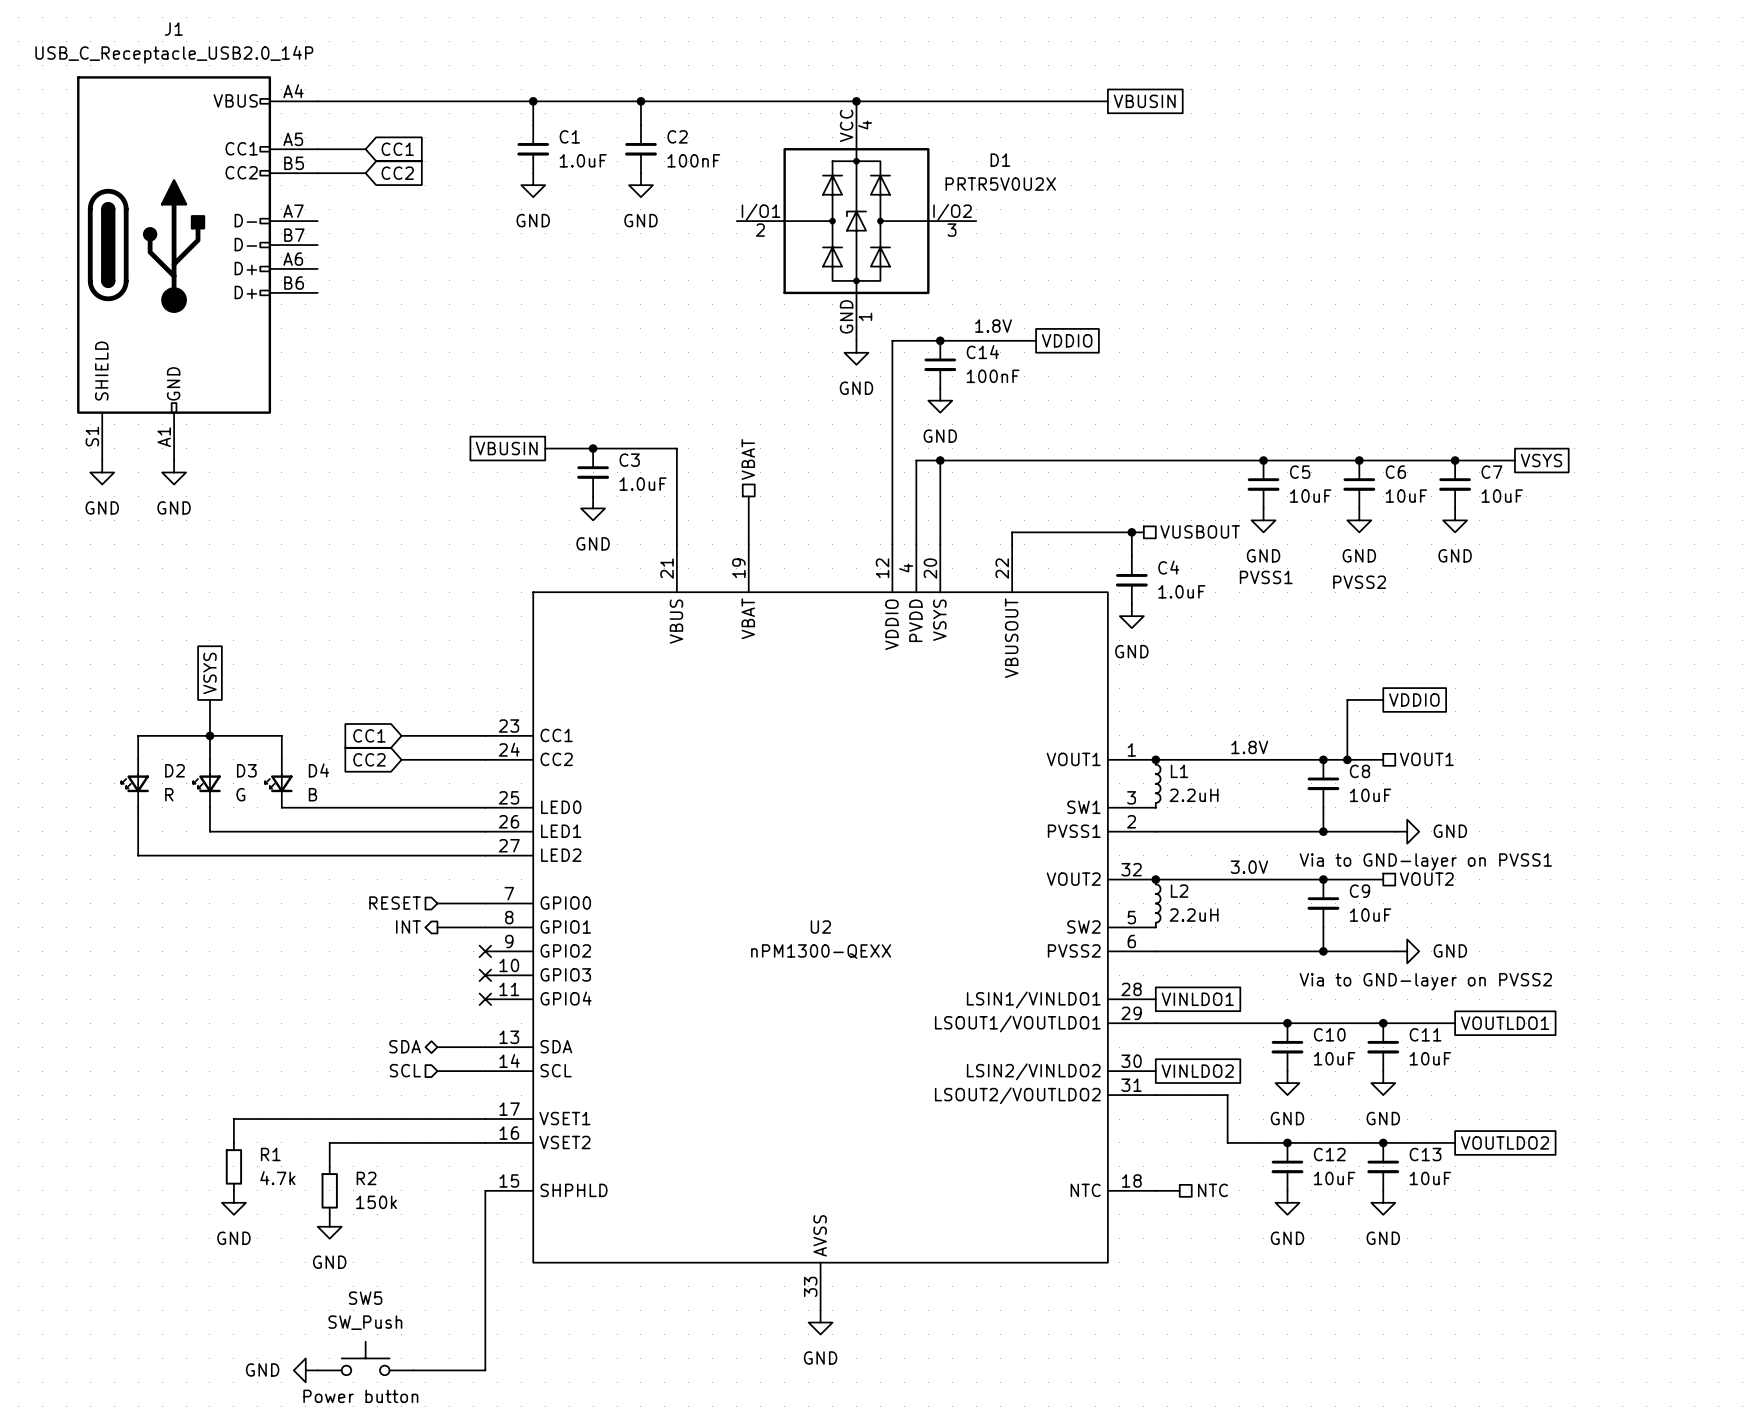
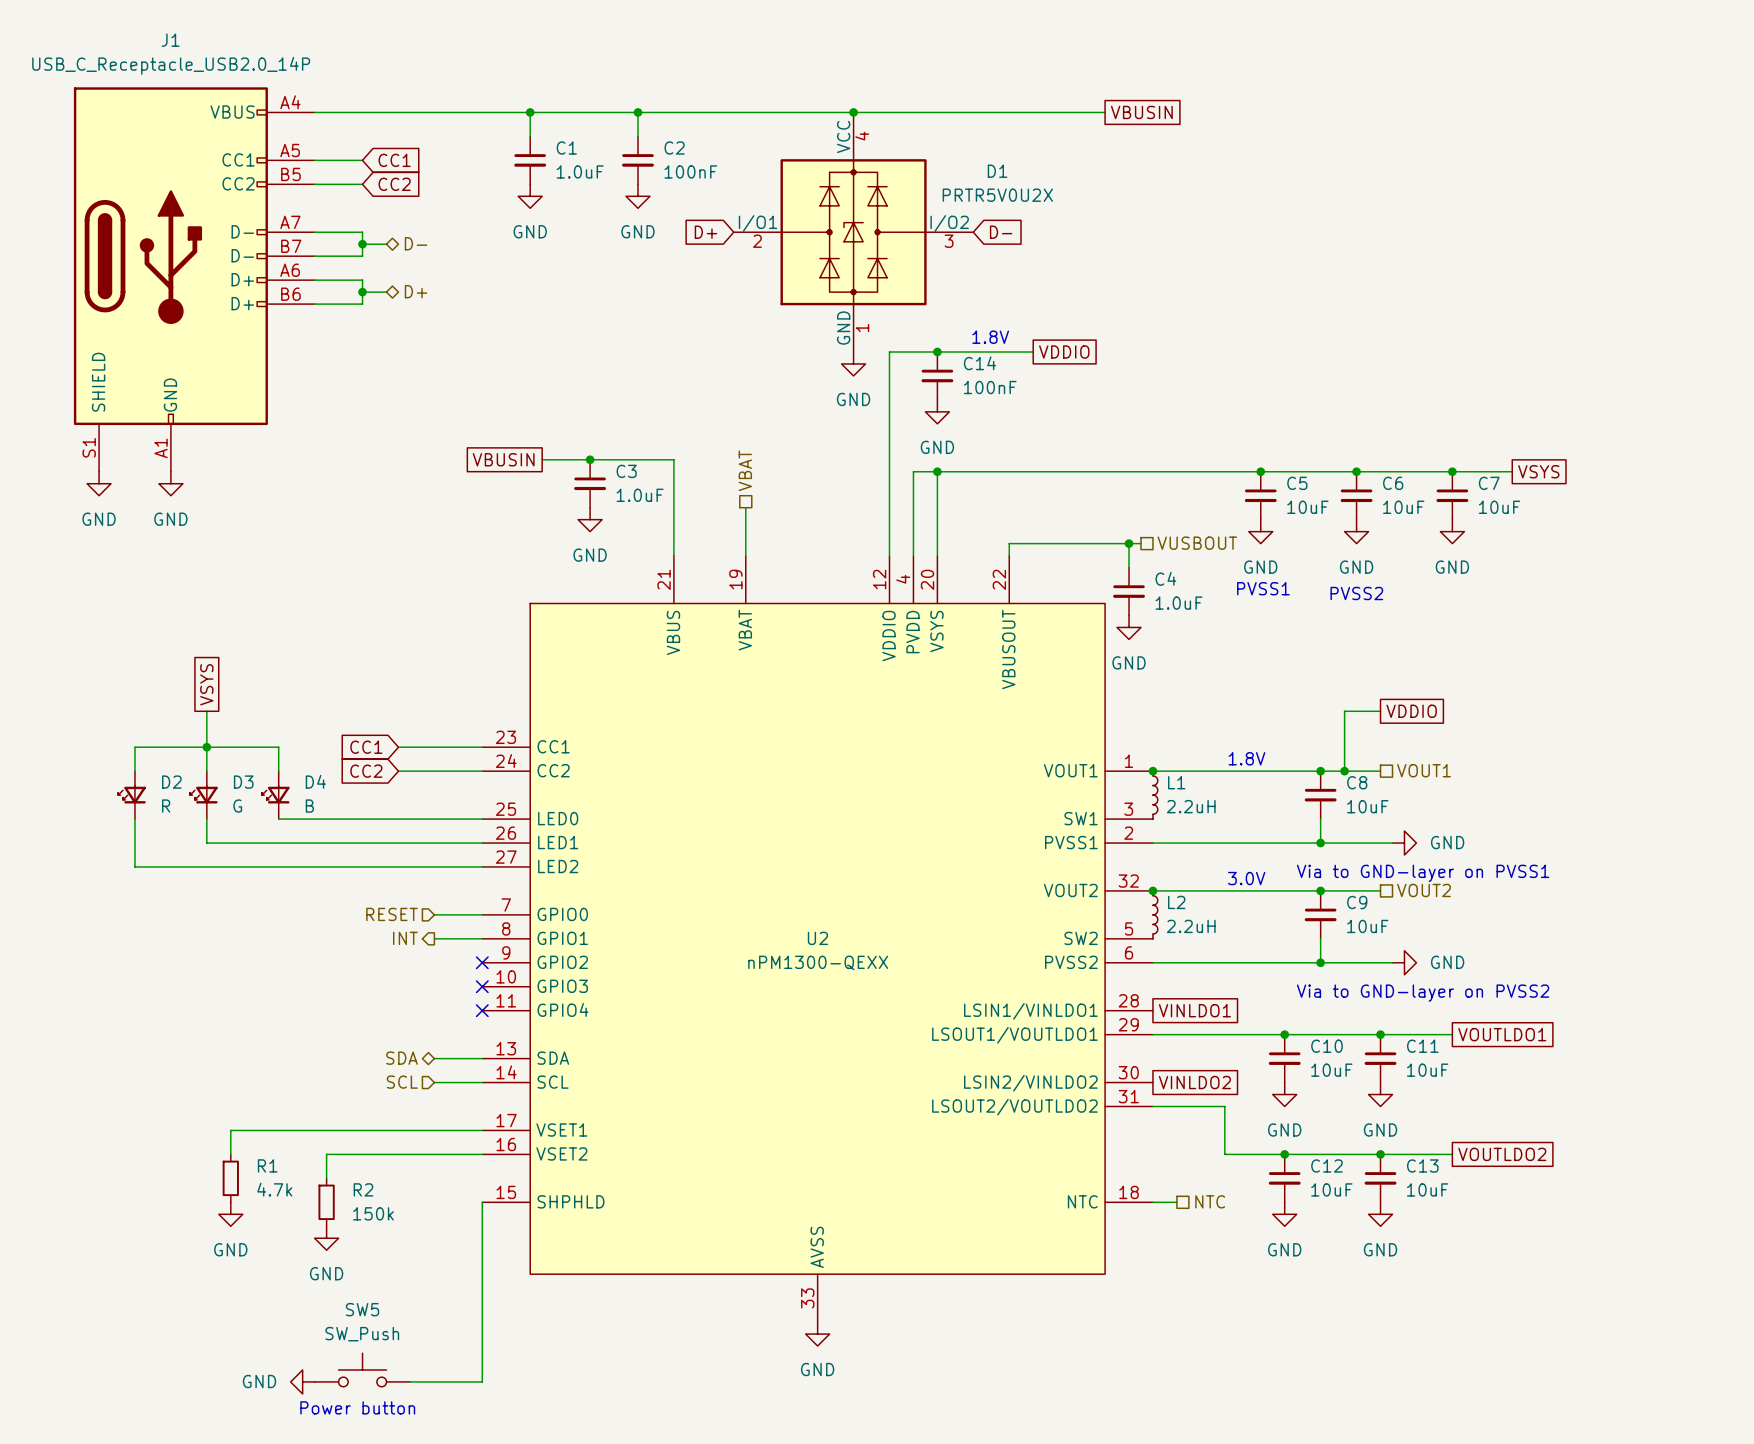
wire: none -> (314, 232) (362, 232) (362, 256) (314, 256)
global label: none -> D+ (705, 232)
global label: none -> D- (1001, 232)
hierarchical label: none -> D- (416, 243)
wire: none -> (362, 244) (386, 244)
junction: none -> (362, 244)
wire: none -> (314, 280) (362, 280) (362, 304) (314, 304)
wire: none -> (362, 292) (386, 292)
junction: none -> (362, 292)
hierarchical label: none -> D+ (416, 291)

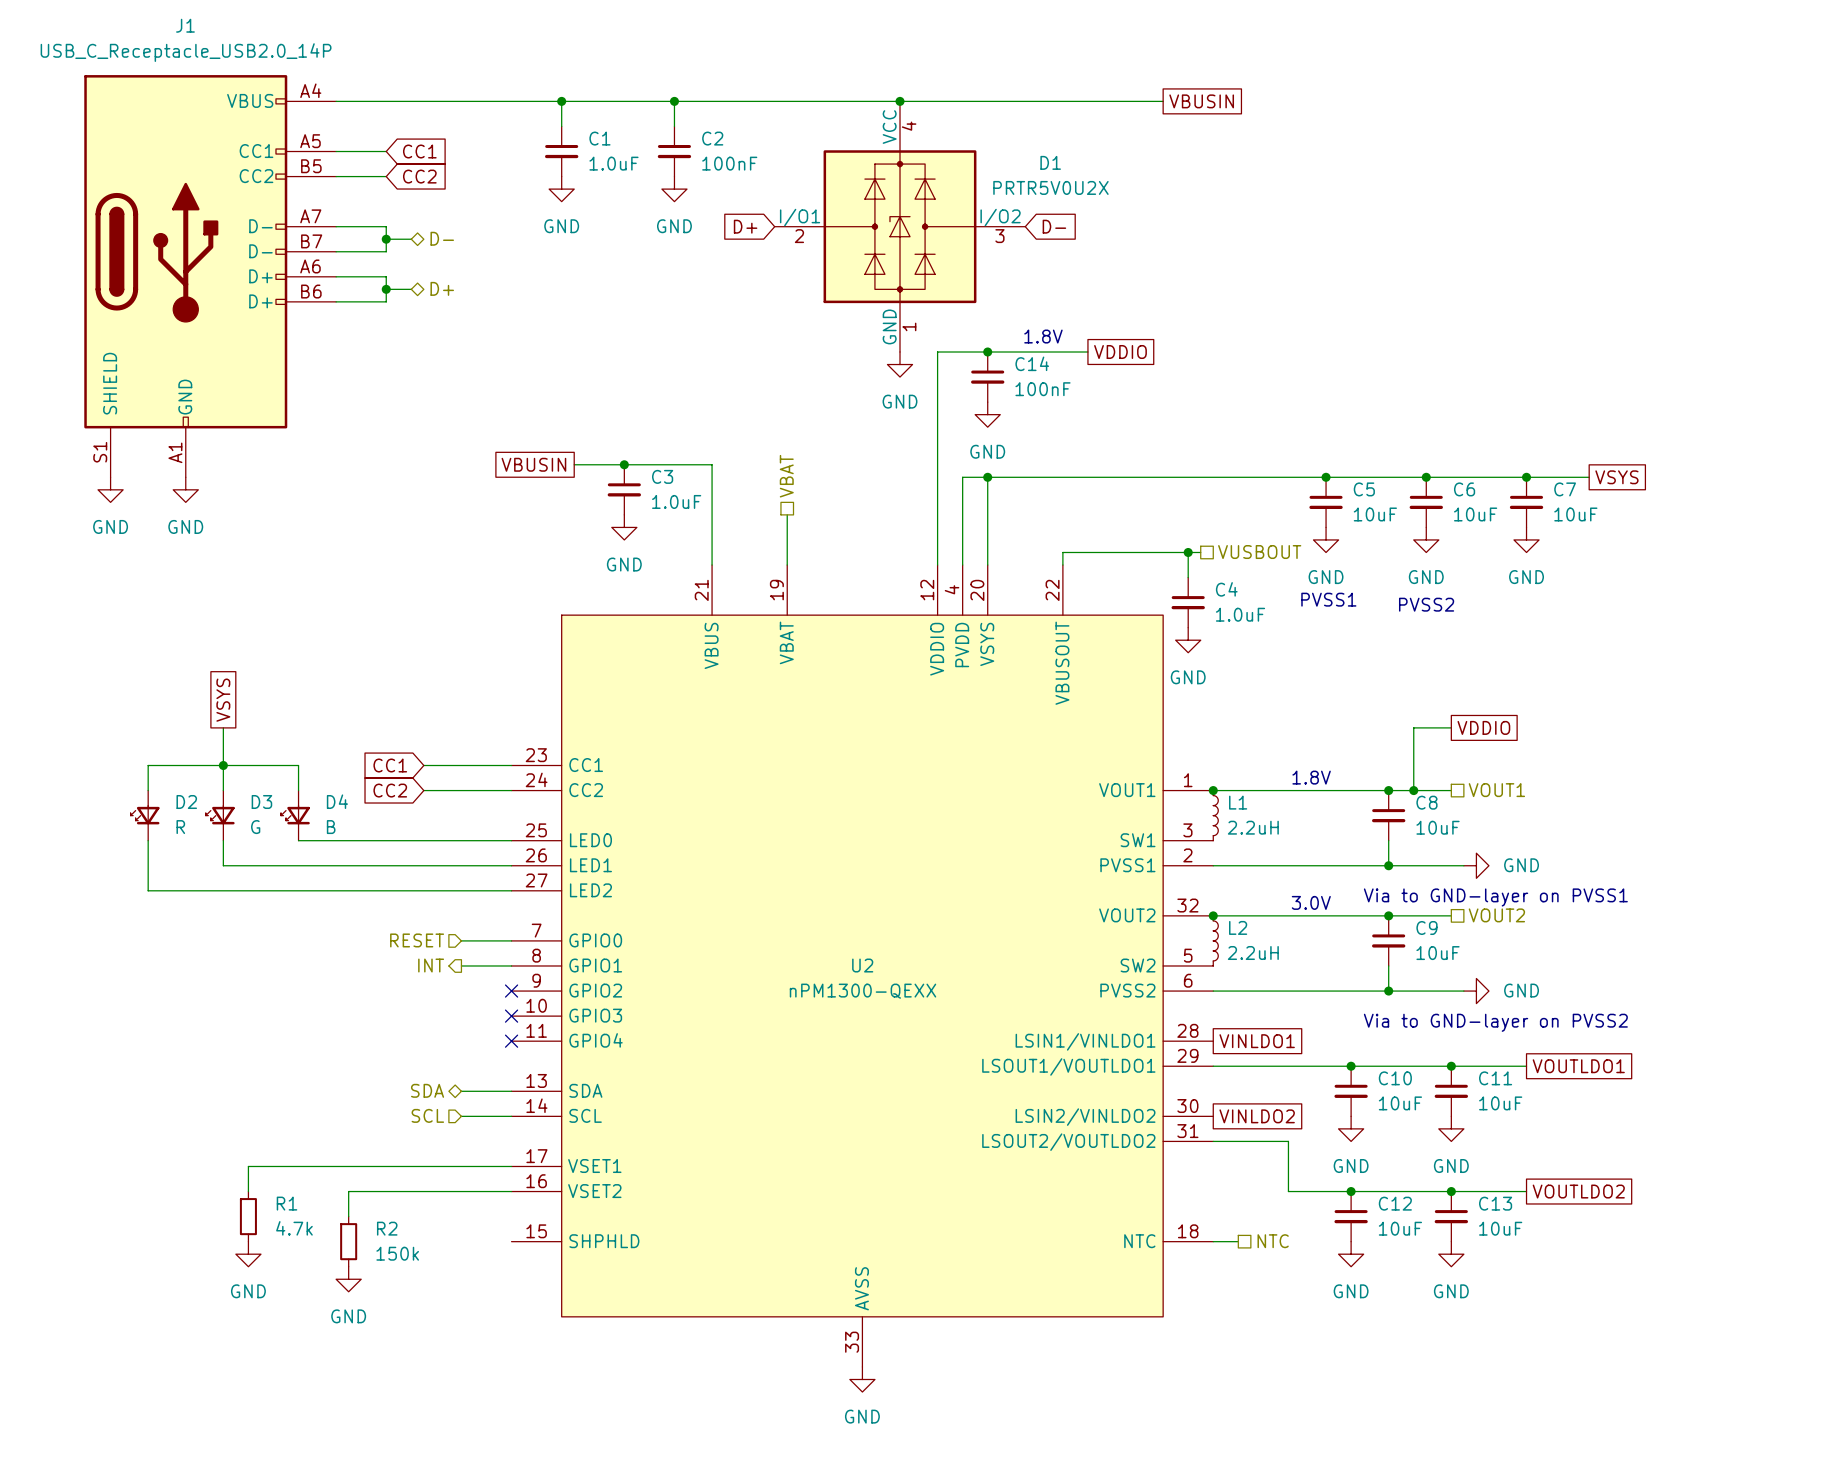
wire: (482, 1202) (482, 1381) (410, 1381) -> none
SW5: SW_Push (362, 1369) -> none
power symbol: GND (302, 1381) -> none
text: Power button (357, 1407) -> none

